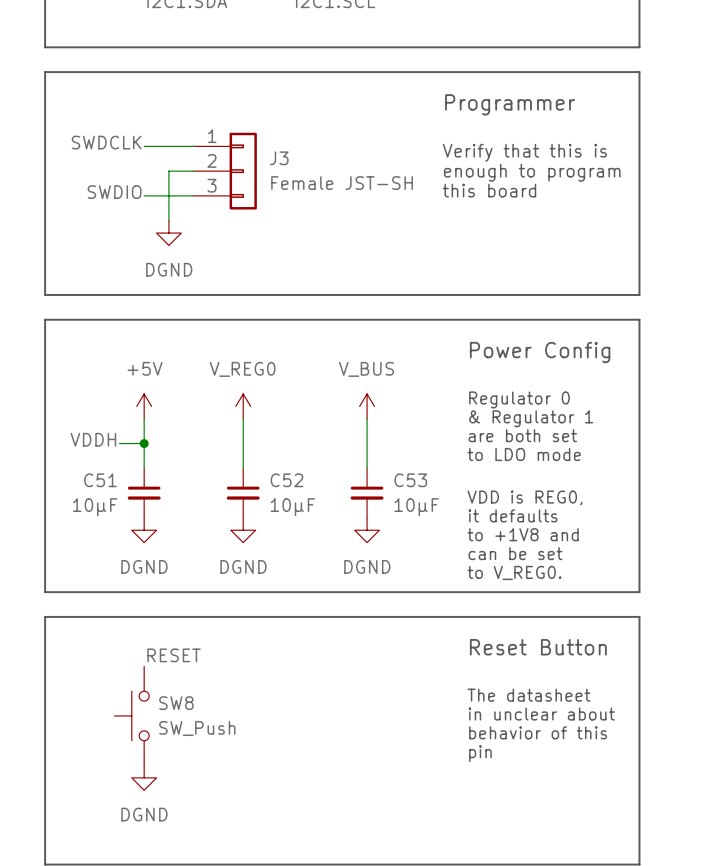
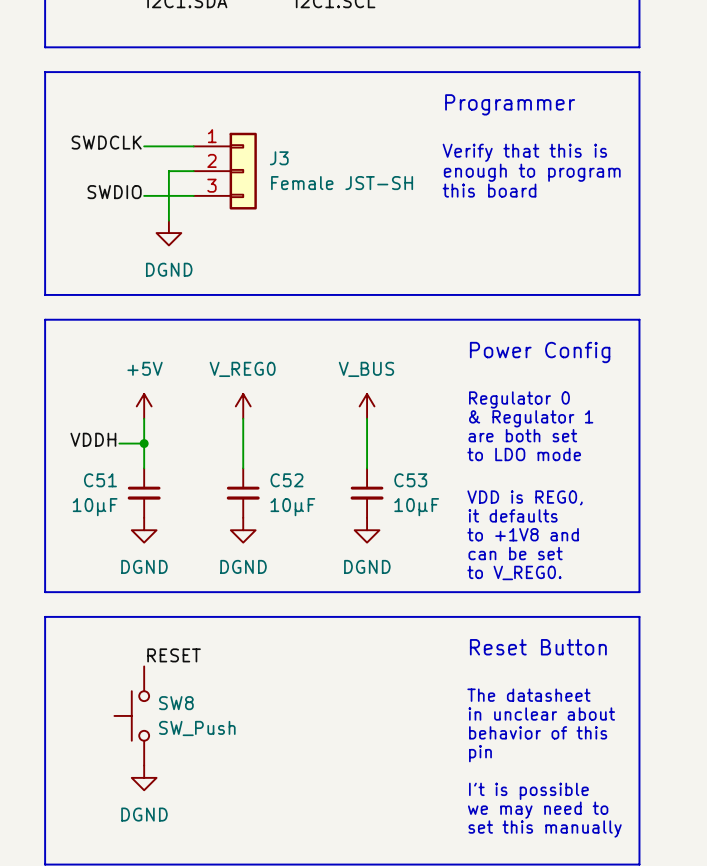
text: none -> I't is possible (528, 791)
text: none -> we may need to (538, 810)
text: none -> set this manually (545, 828)

